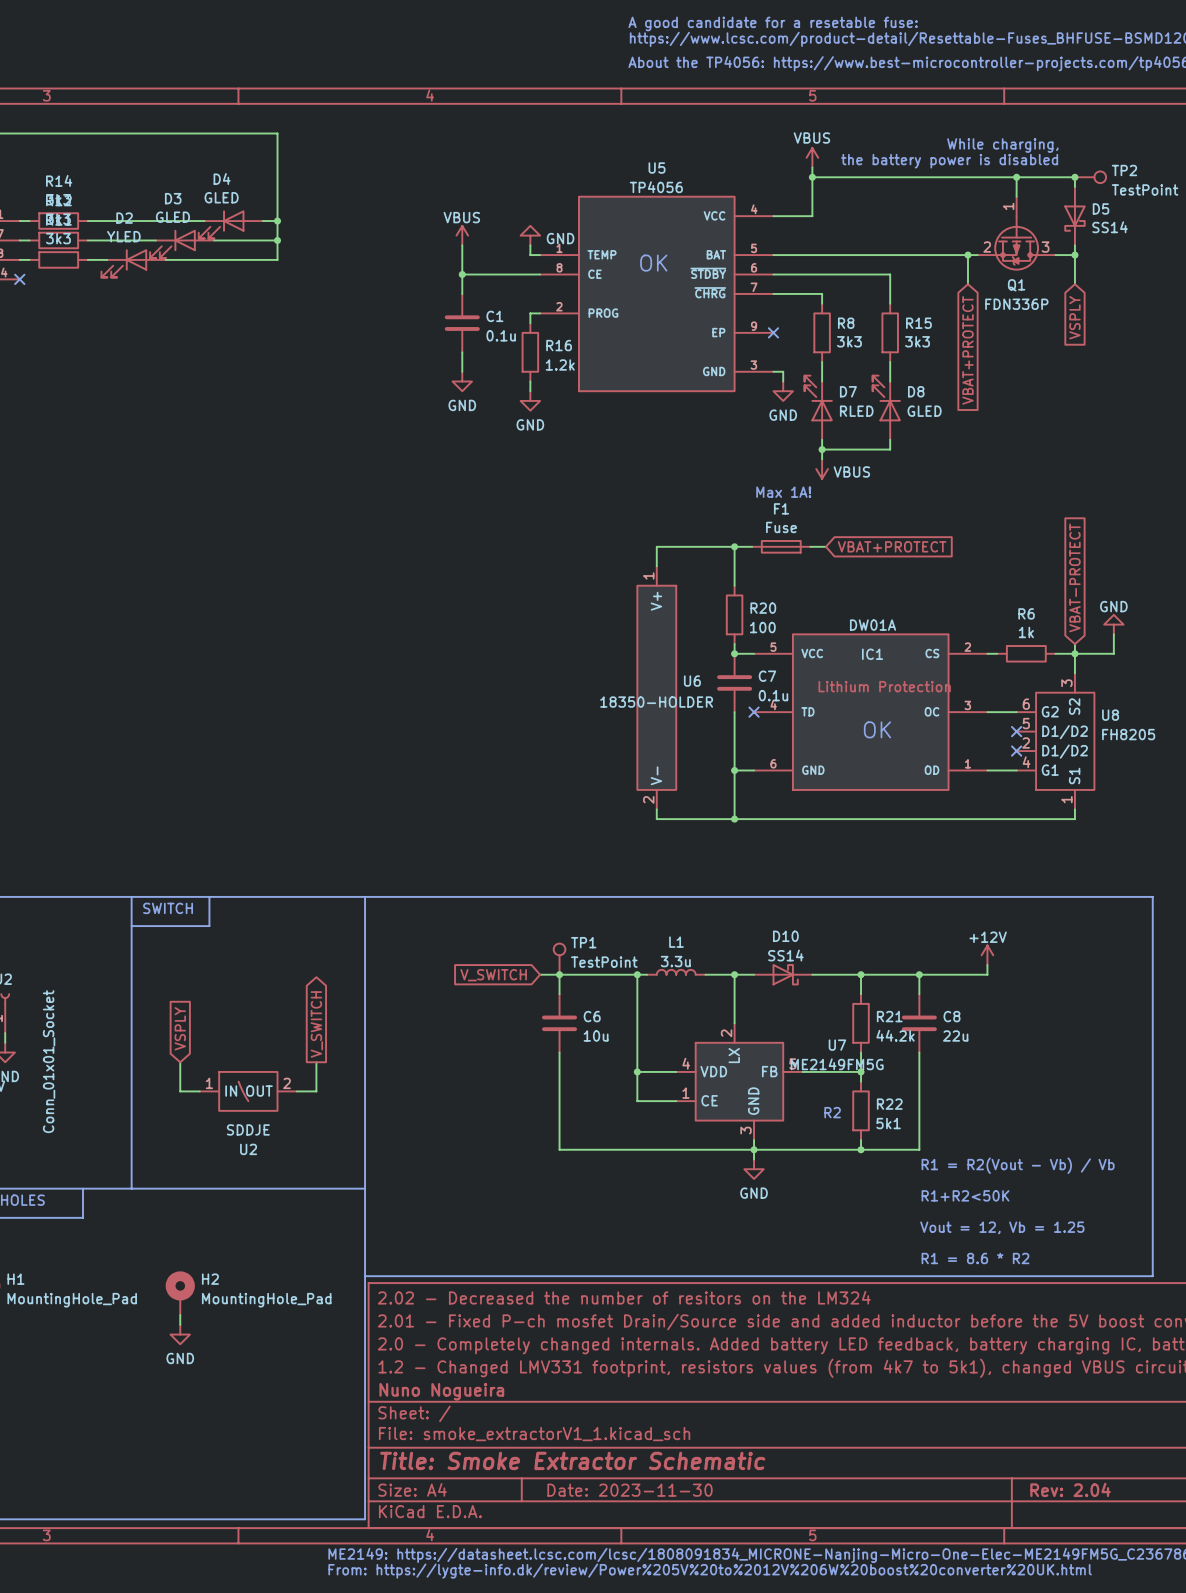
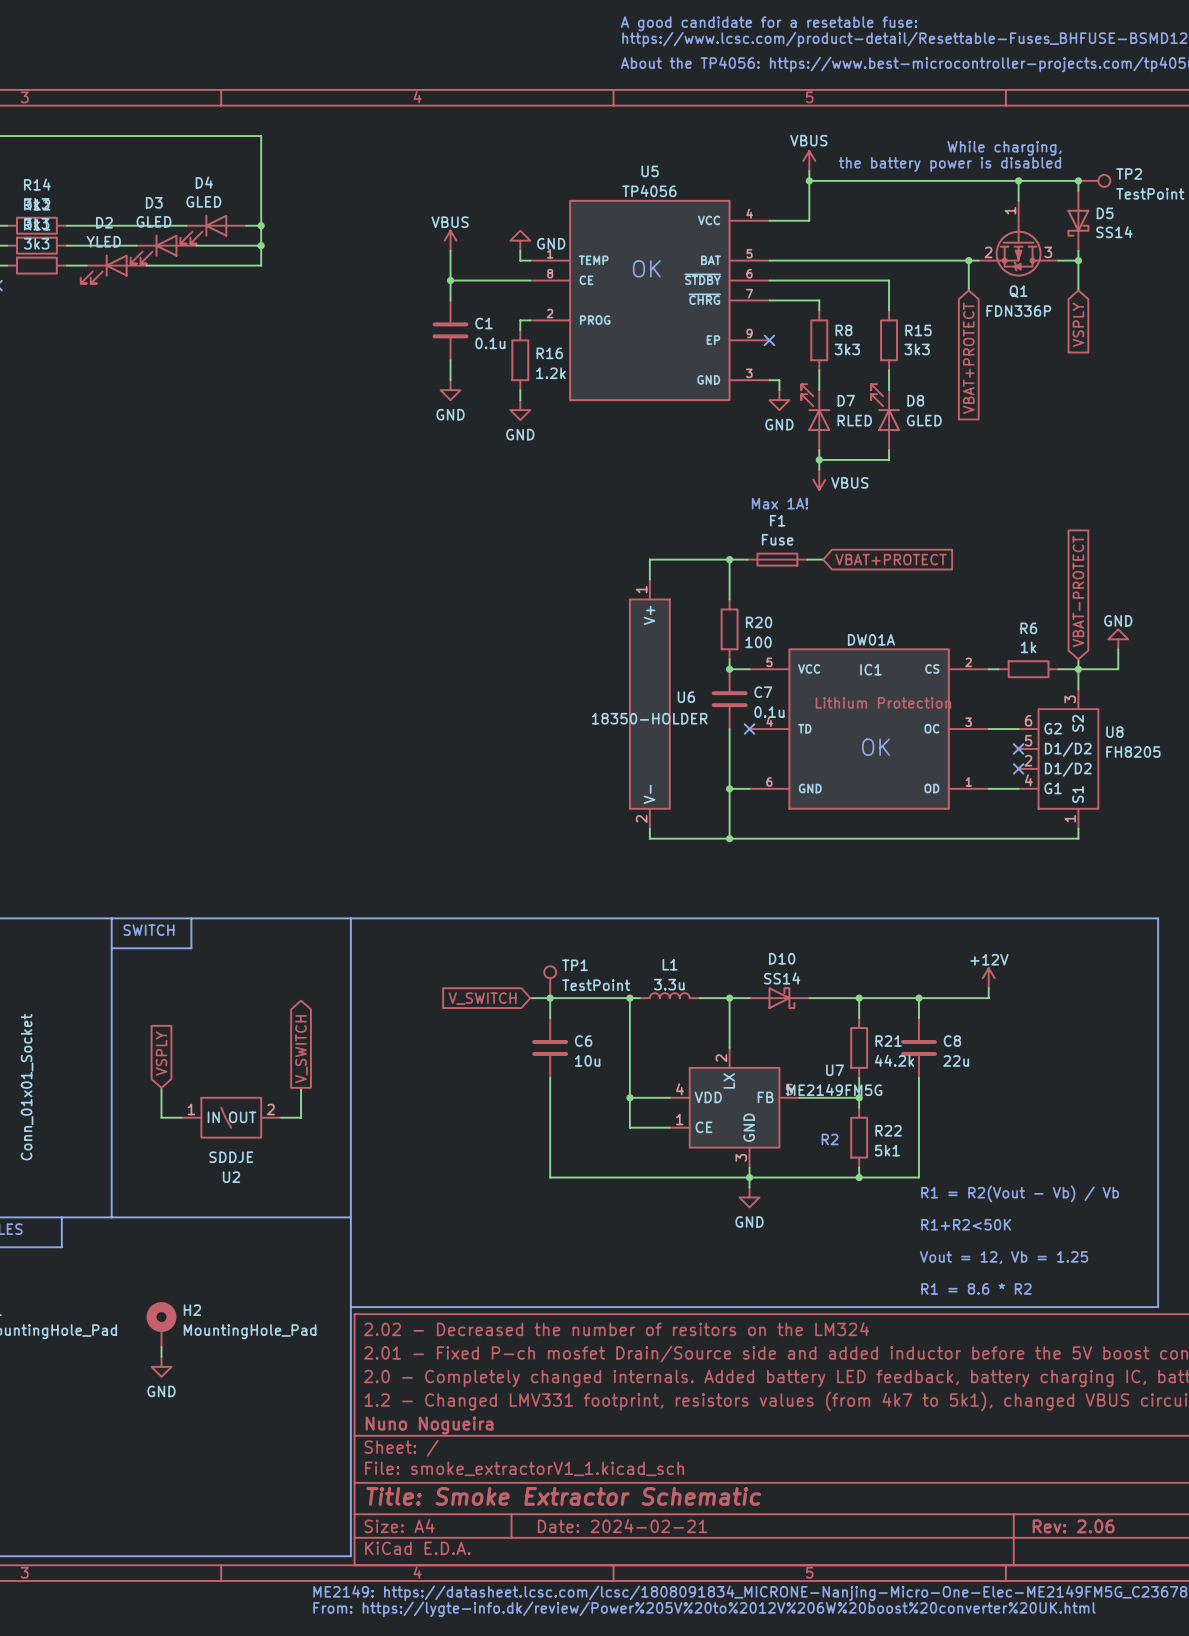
title block: Rev: 2.04 (1070, 1489) -> Rev: 2.06 (1073, 1526)
title block: Date: 2023-11-30 (630, 1490) -> Date: 2024-02-21 (622, 1526)

